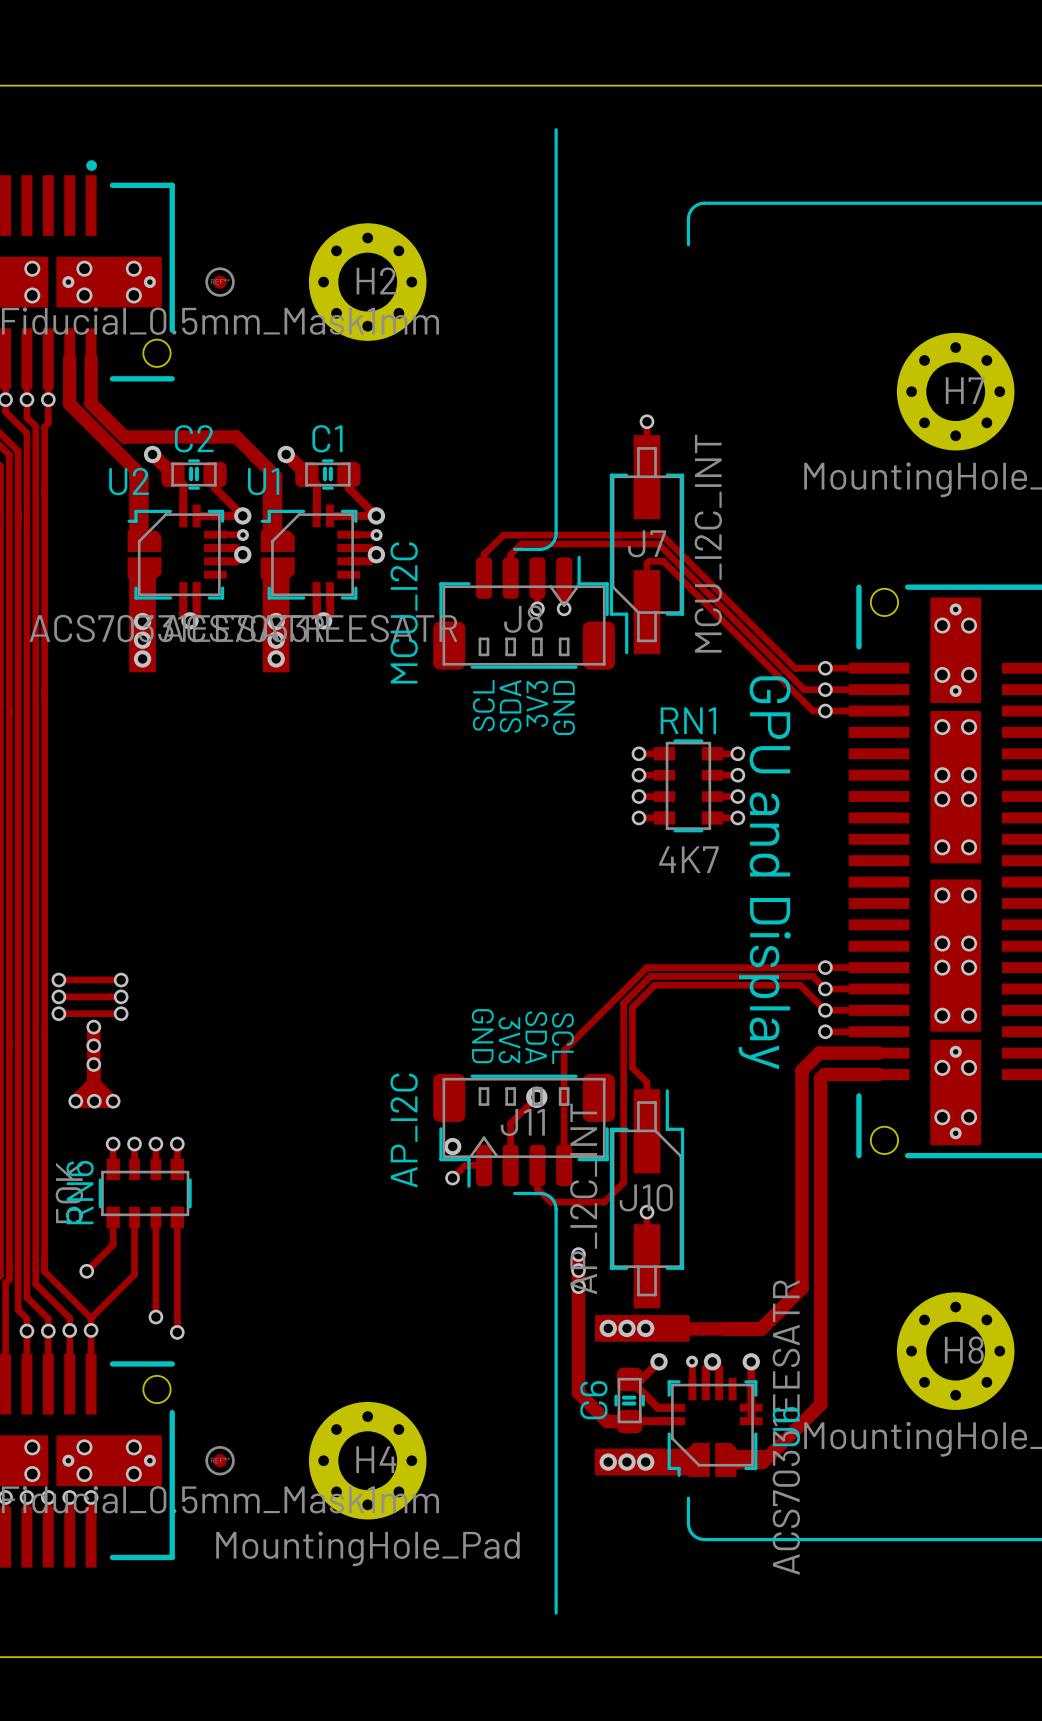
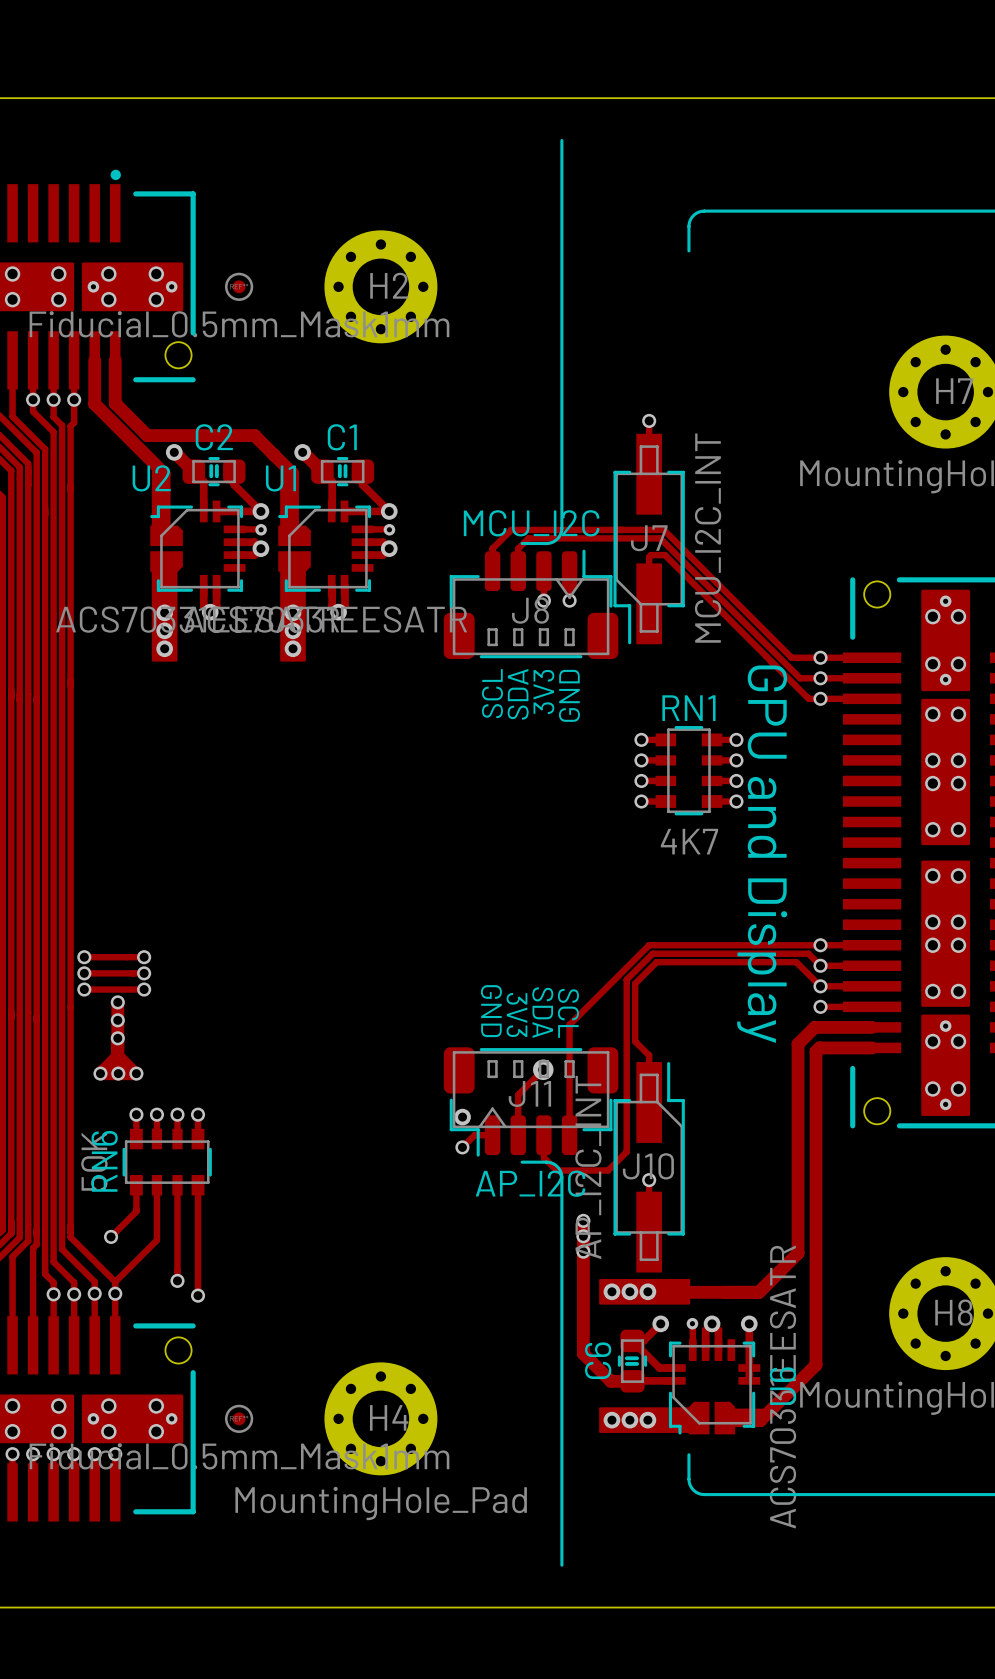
J8 value rotation: 0° (404, 612) -> 90° clockwise (531, 523)
J11 value rotation: 0° (404, 1130) -> 90° clockwise (530, 1183)

